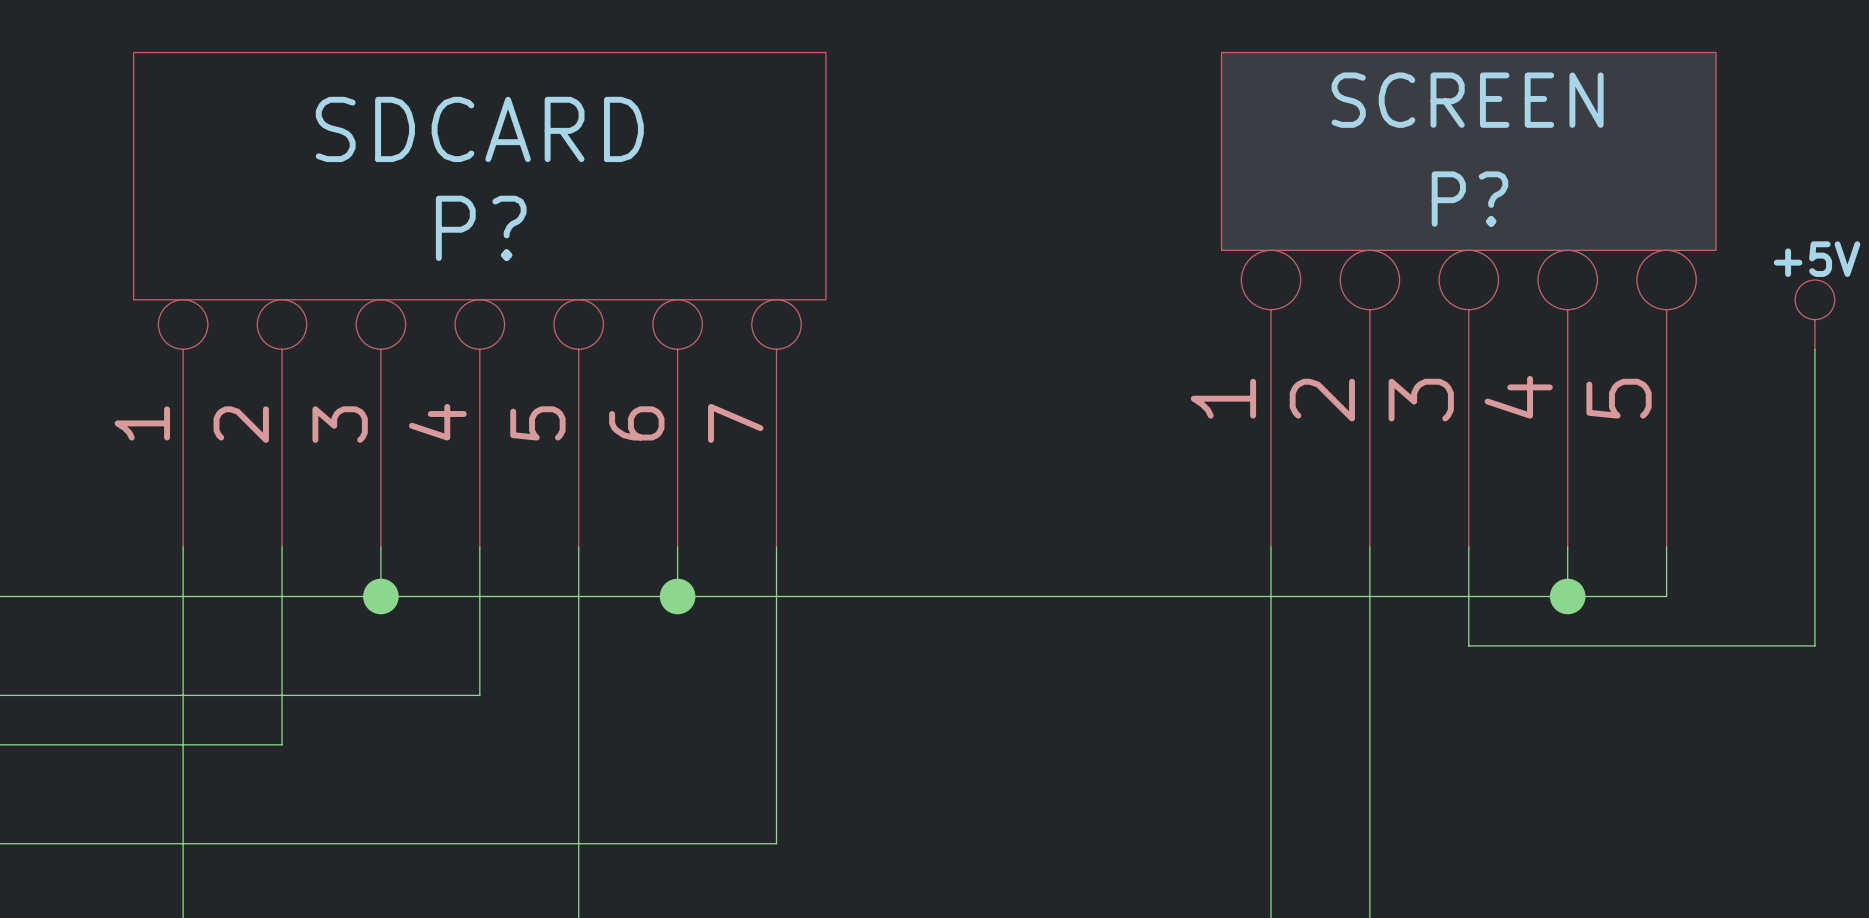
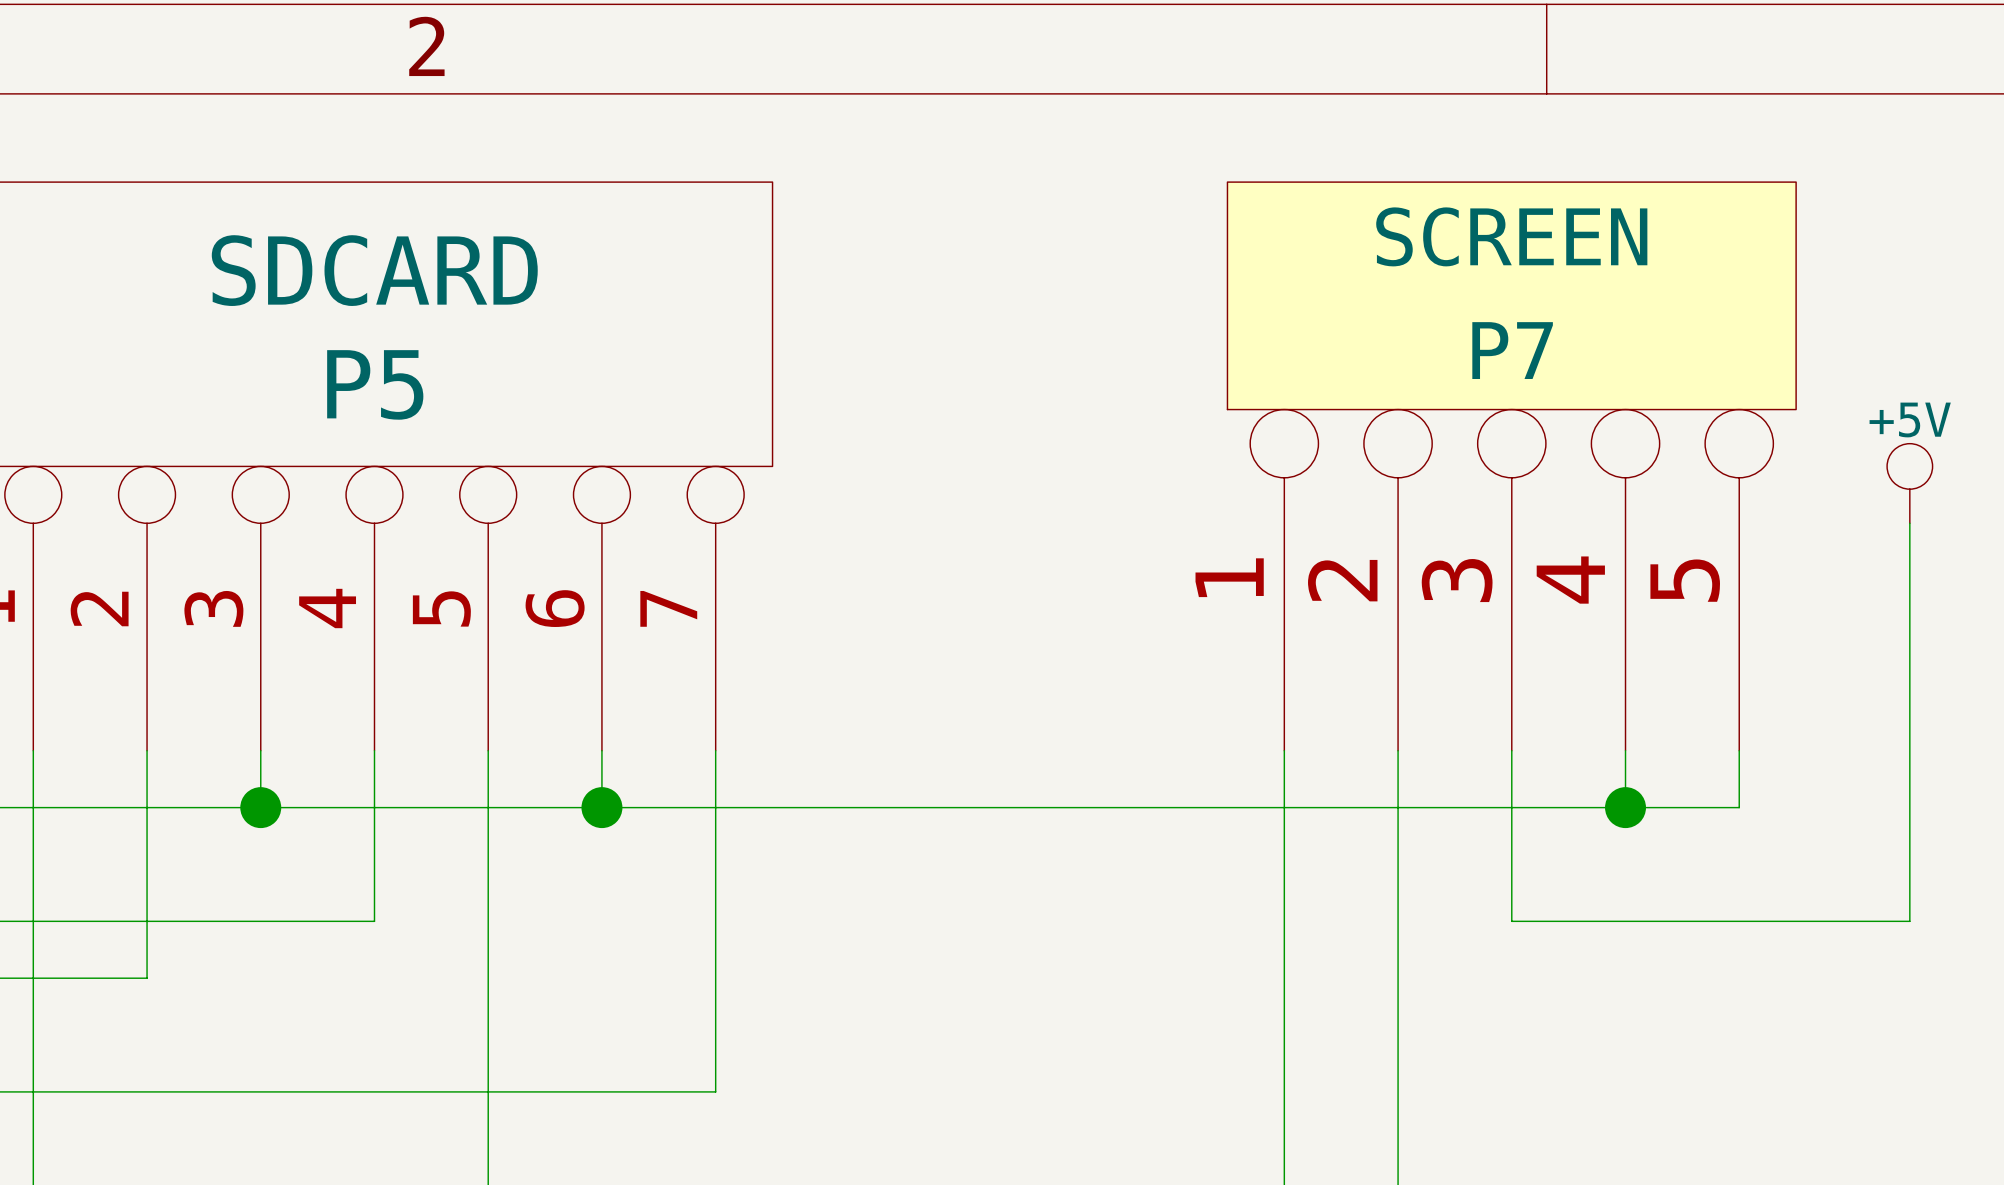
P? name: P? (1469, 199) -> P7 (1512, 350)
P? name: P? (481, 228) -> P5 (375, 384)
wire: (1468, 645) (1814, 645) -> (1511, 864) (1511, 921) (1909, 921) (1909, 864)

